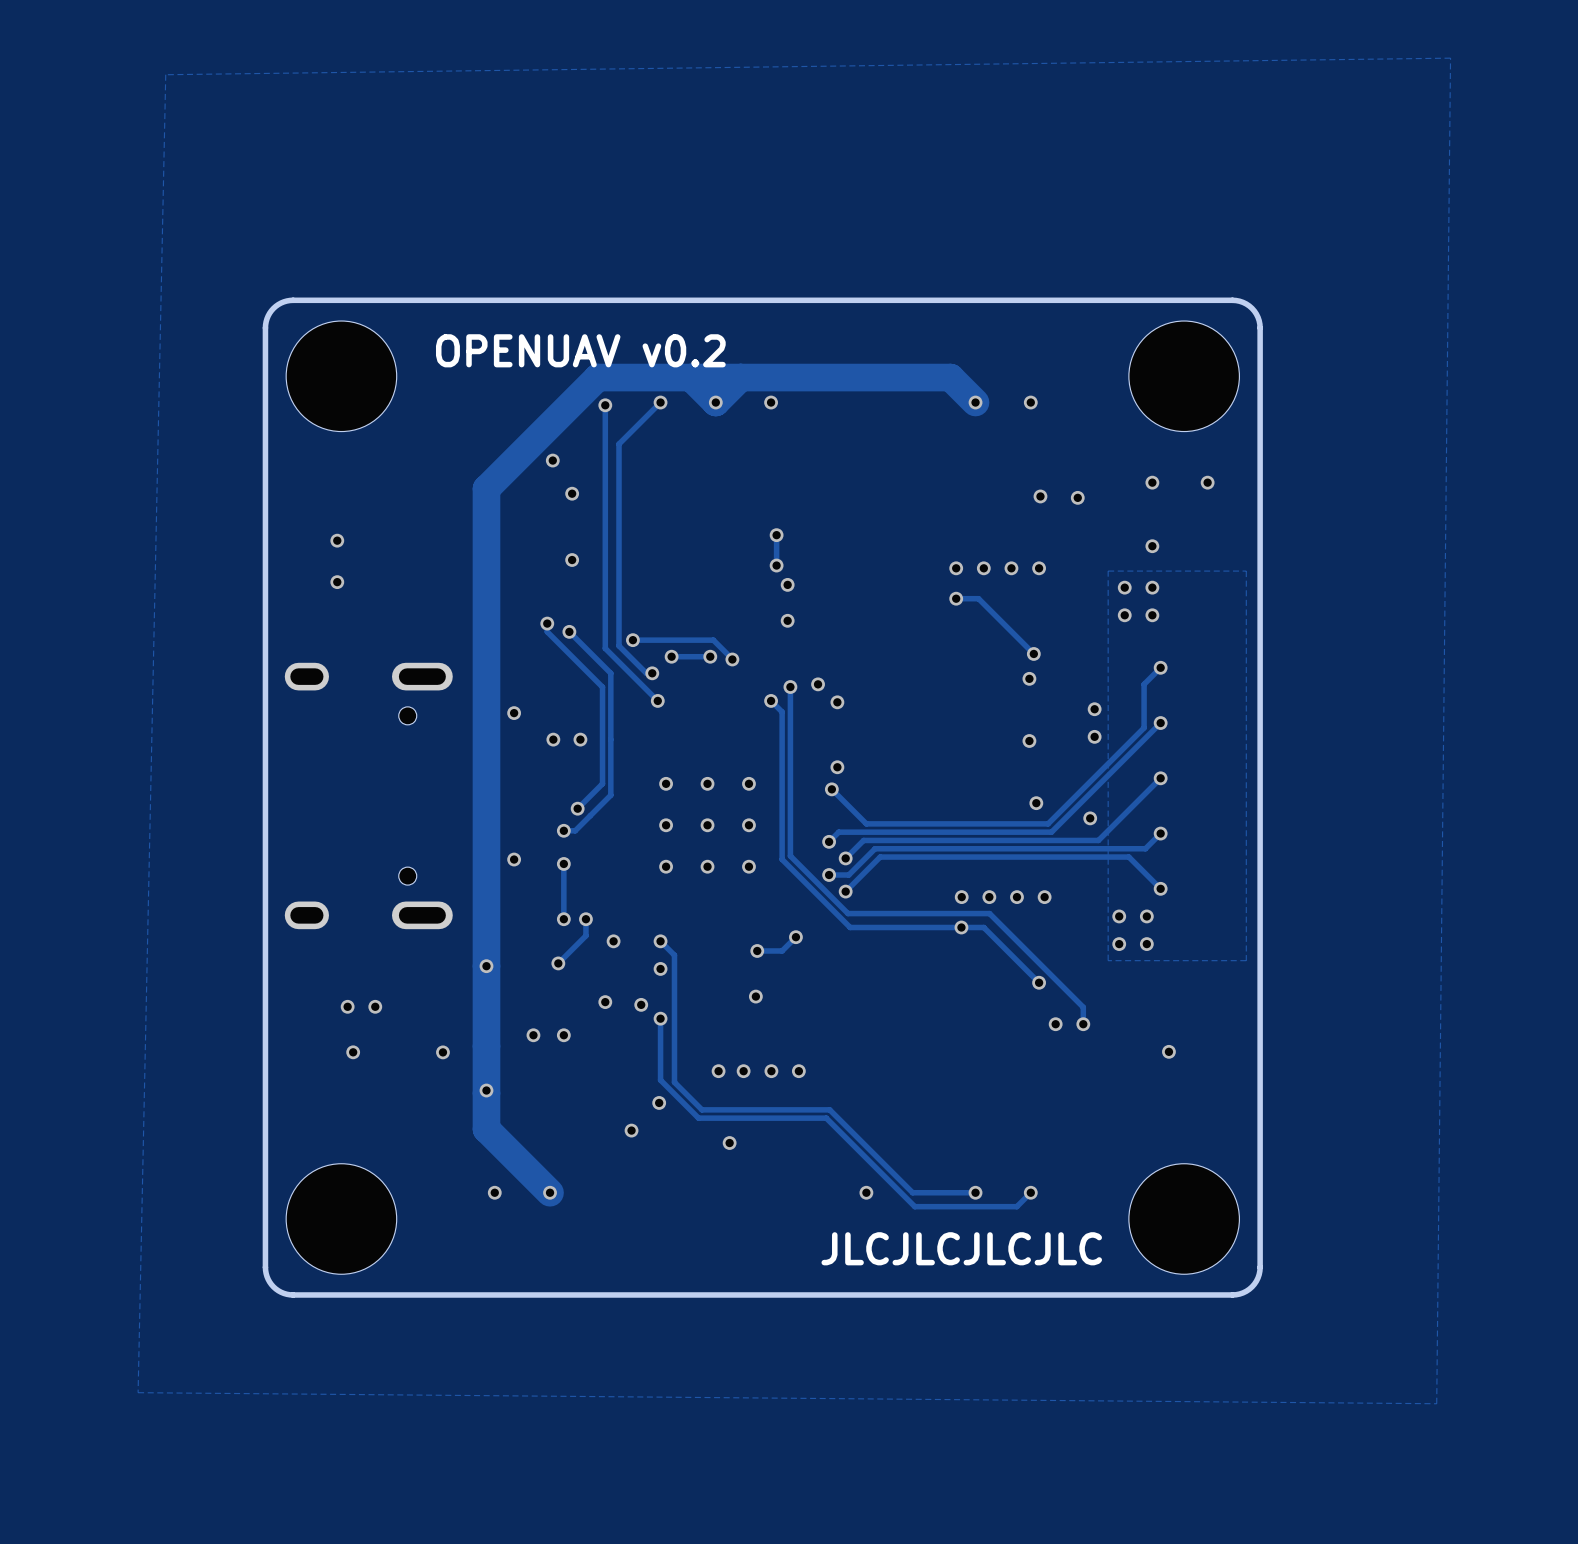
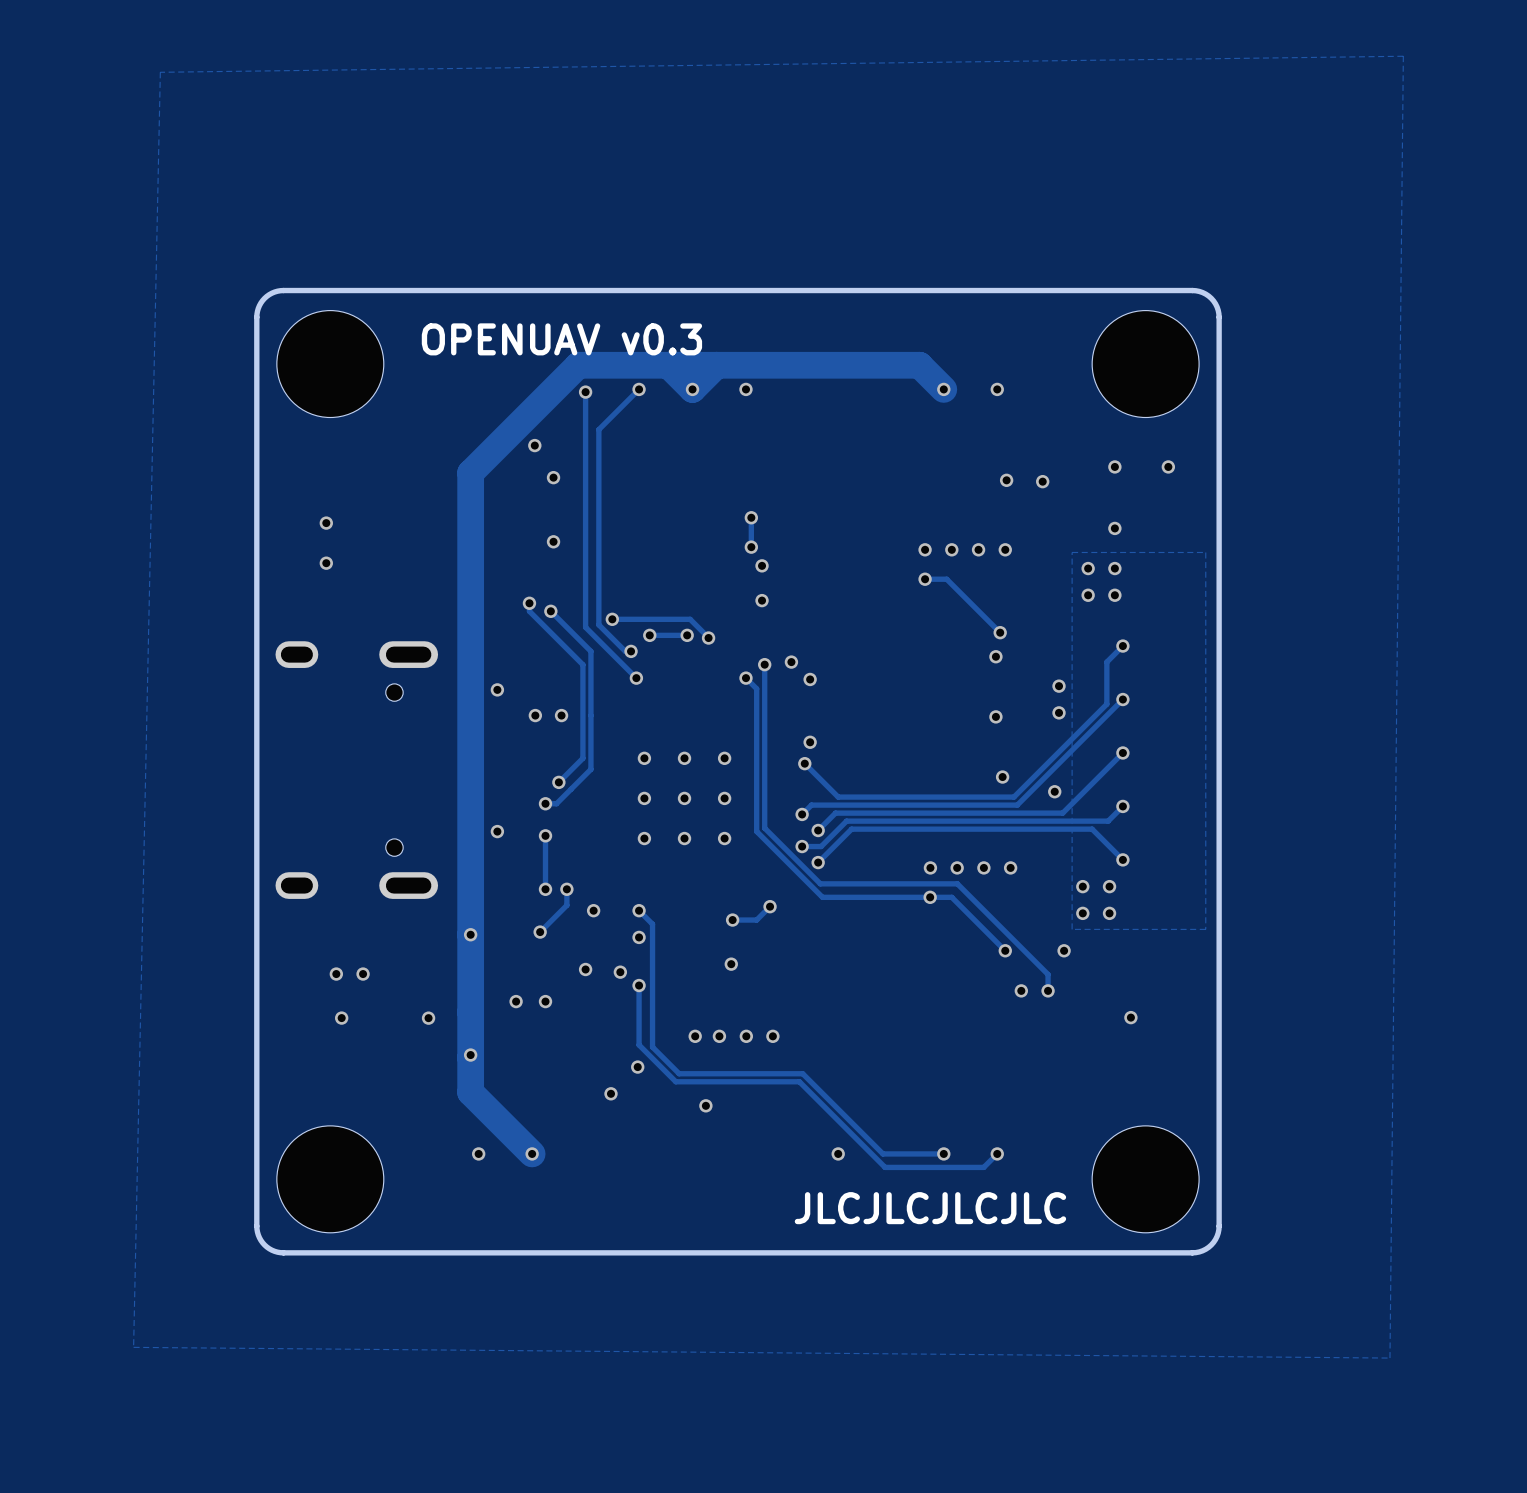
text: OPENUAV v0.2 (580, 350) -> OPENUAV v0.3 (561, 339)
via: none -> (1064, 950)

